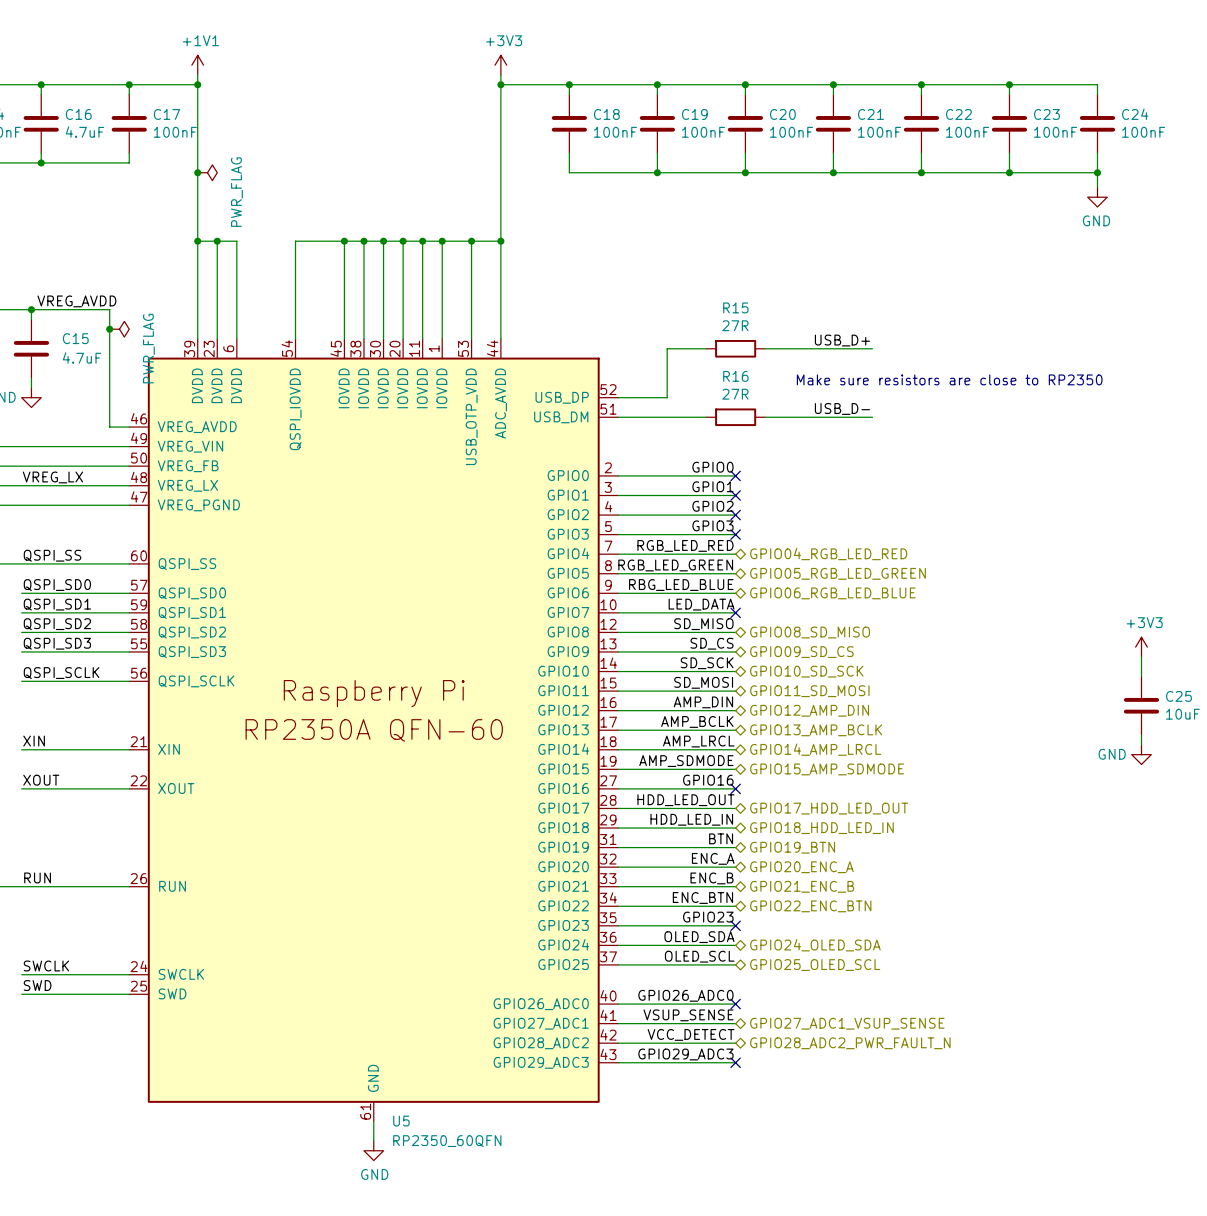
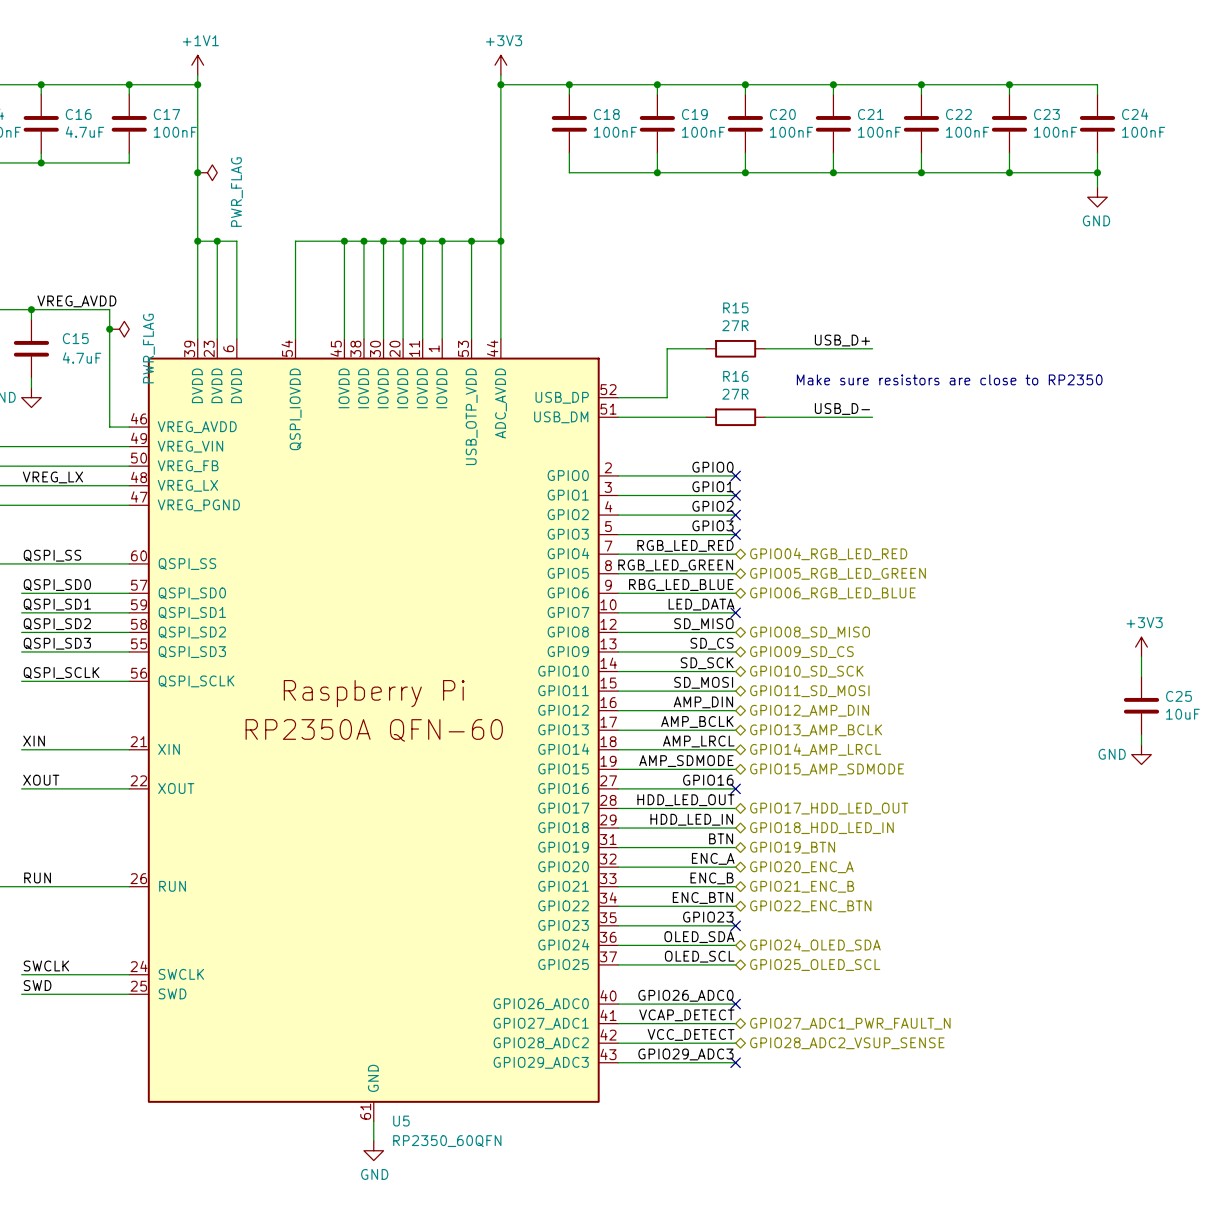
label: VSUP_SENSE (688, 1015) -> VCAP_DETECT (686, 1015)
hierarchical label: GPIO27_ADC1_VSUP_SENSE (847, 1023) -> GPIO27_ADC1_PWR_FAULT_N (850, 1023)
hierarchical label: GPIO28_ADC2_PWR_FAULT_N (850, 1043) -> GPIO28_ADC2_VSUP_SENSE (847, 1043)

